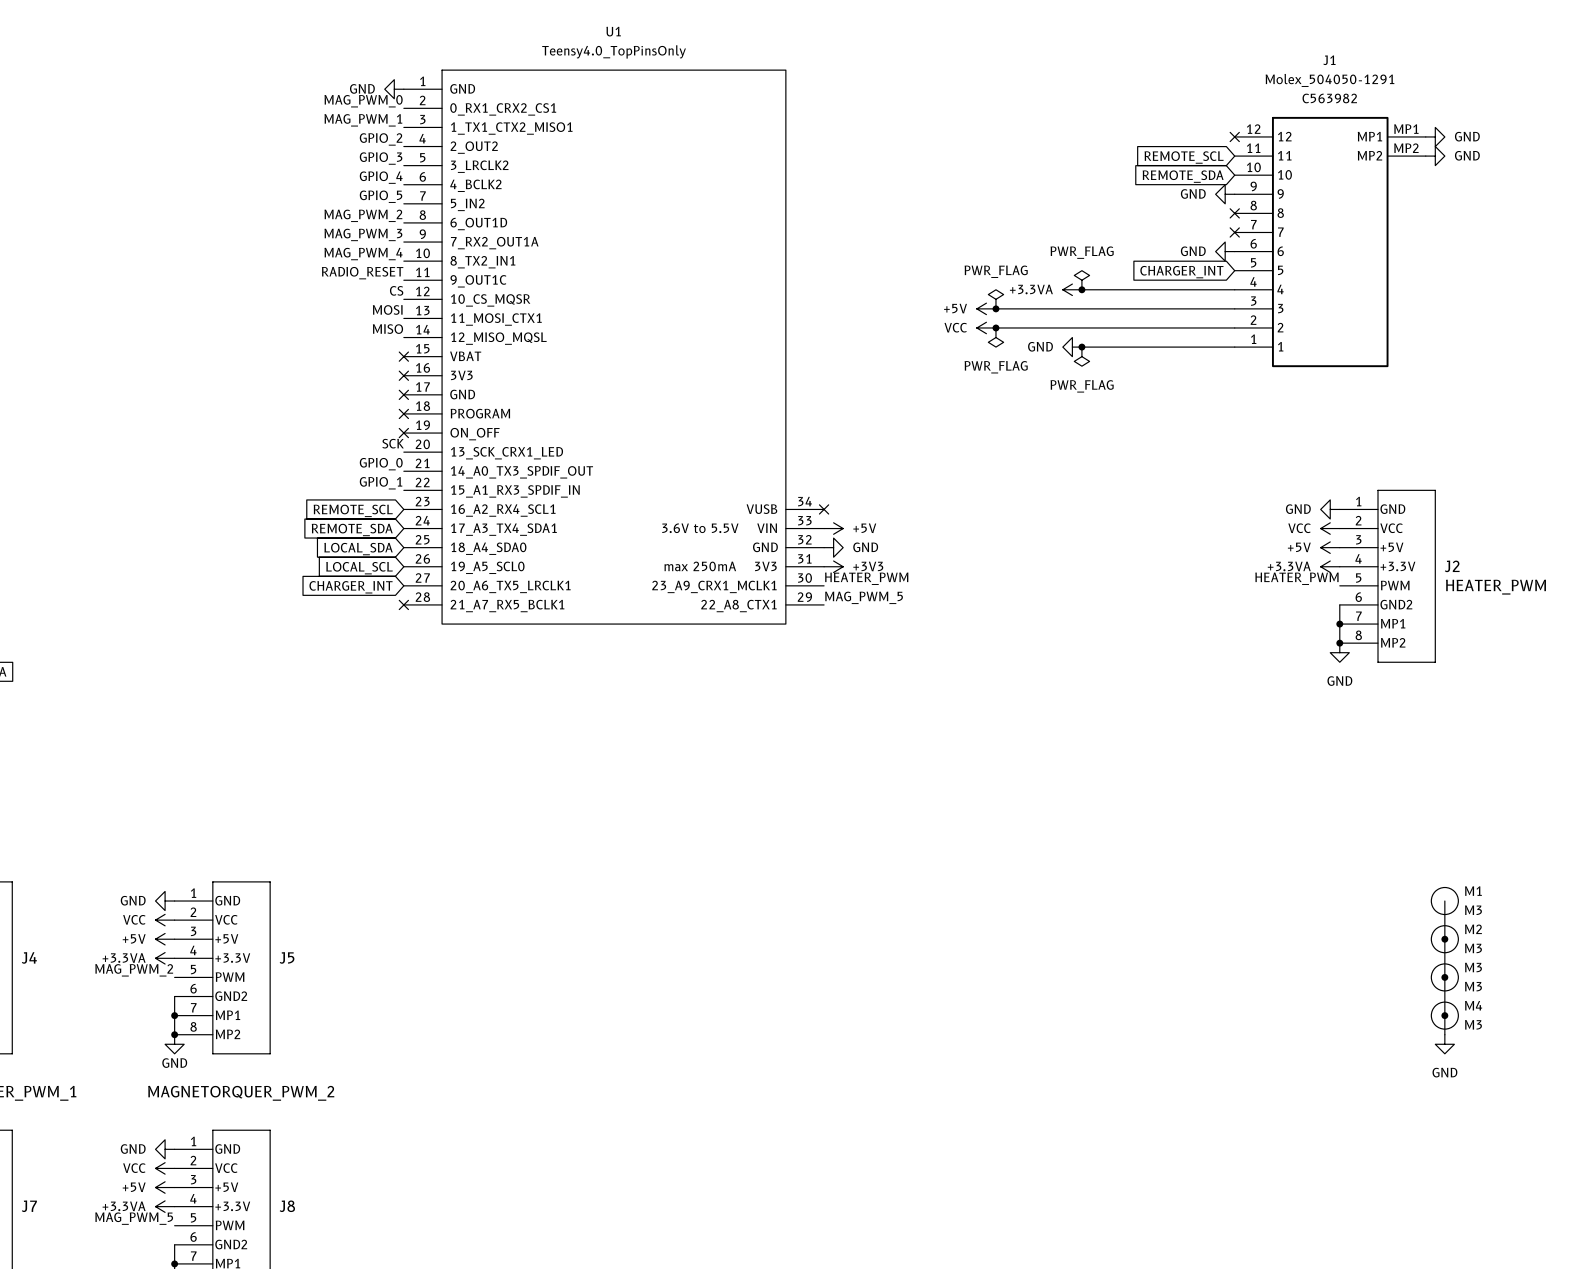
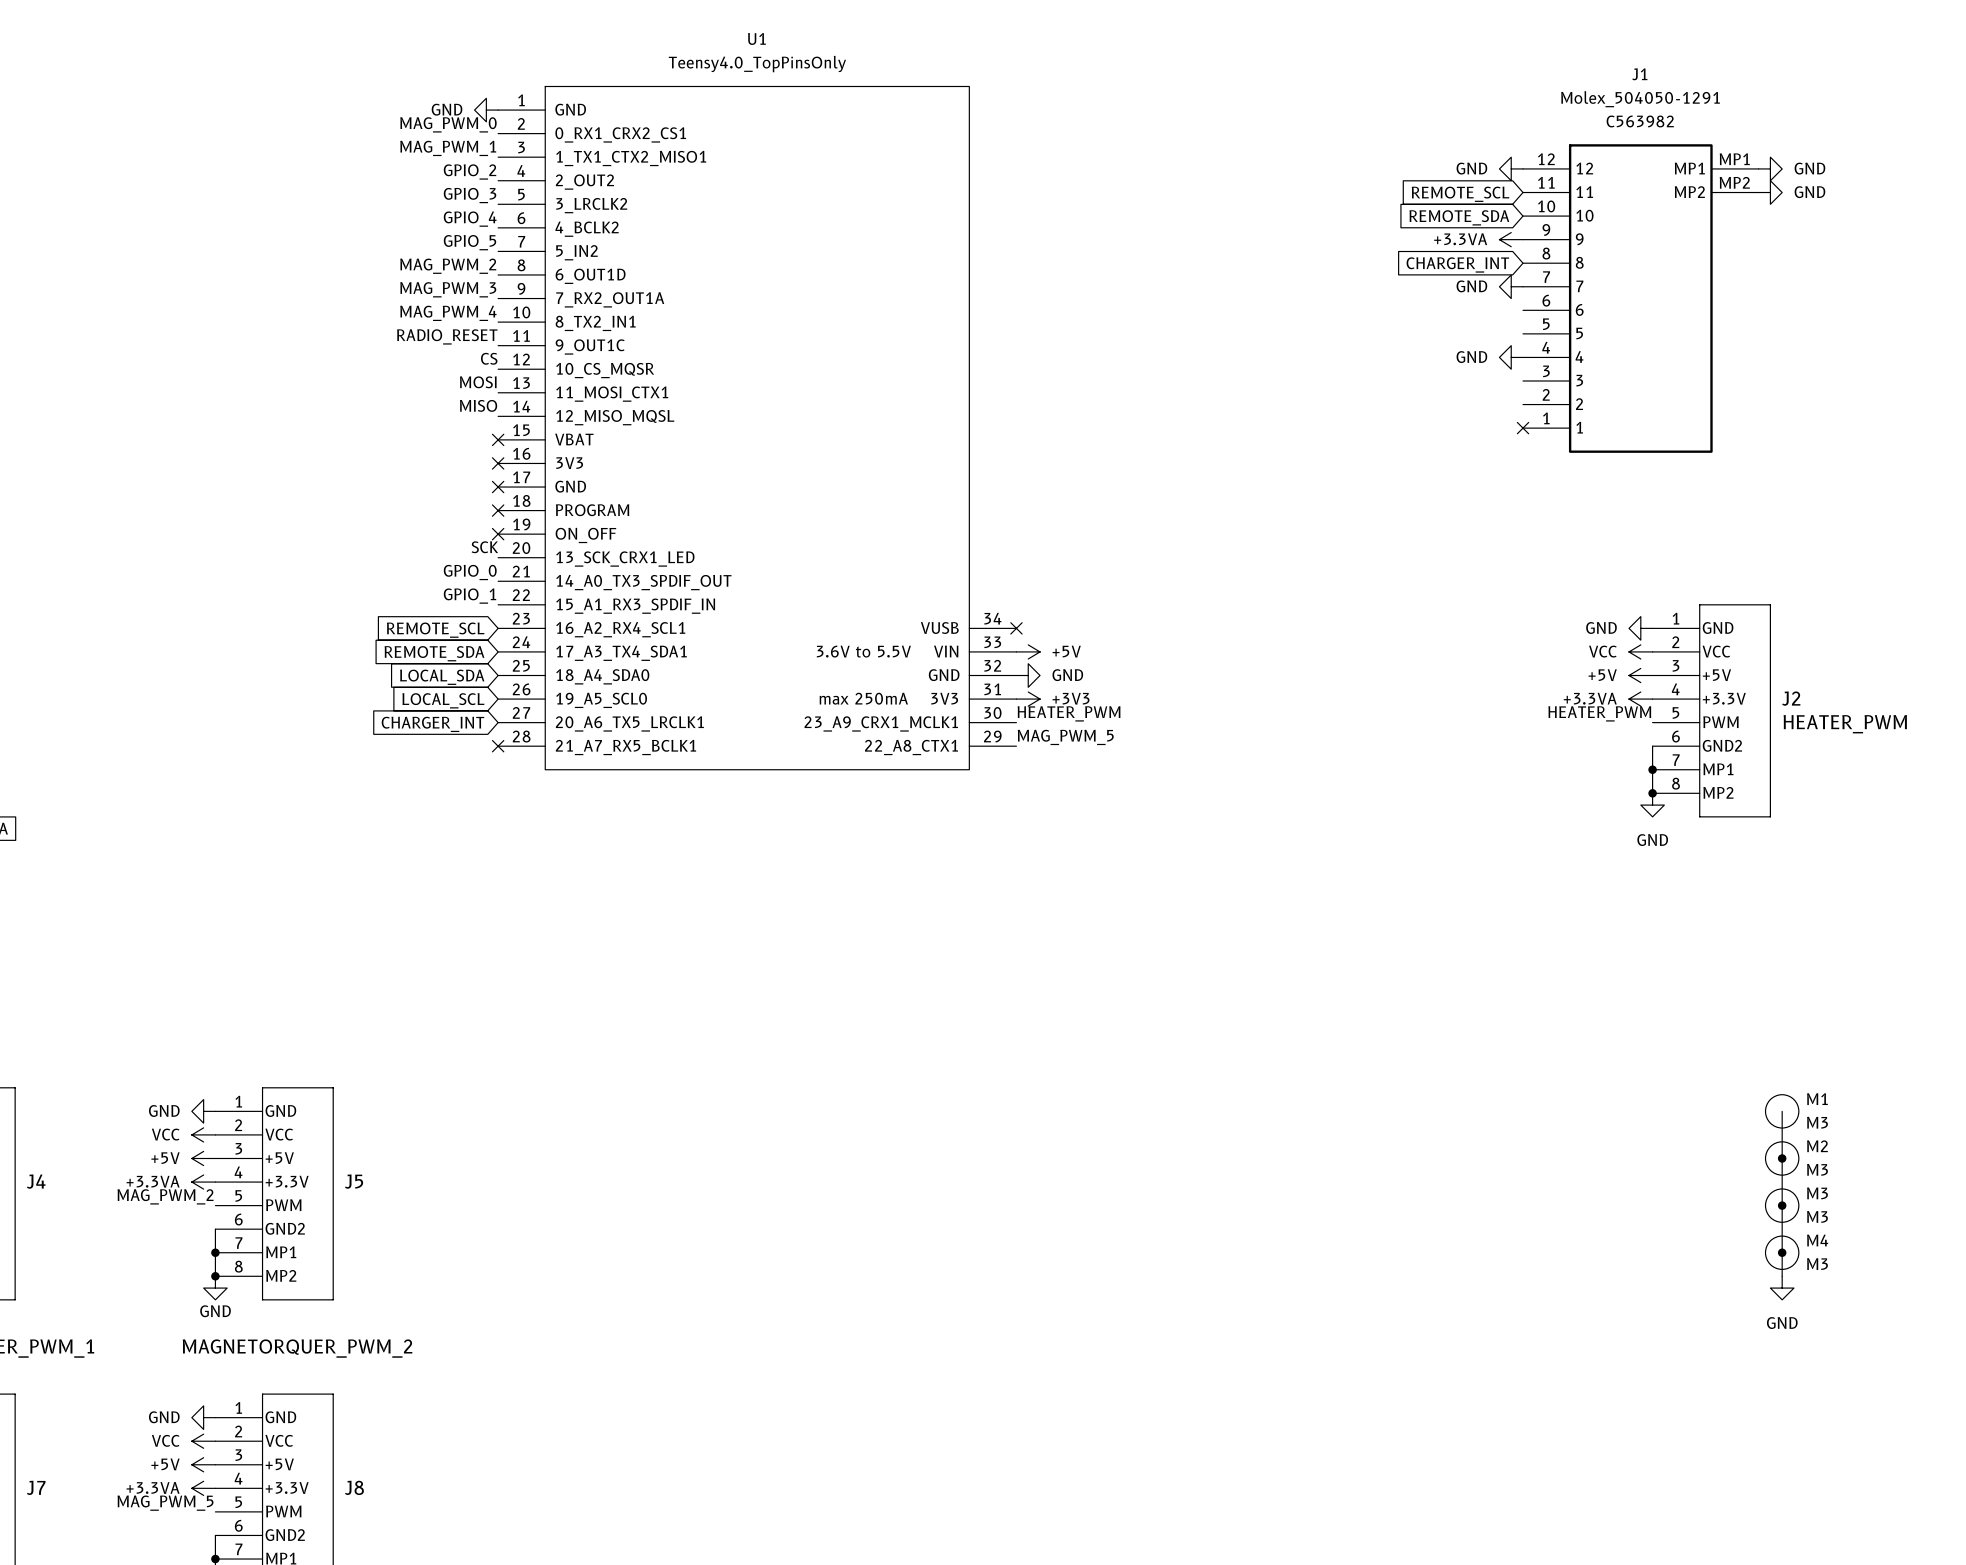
power symbol: none -> GND (1511, 168)
no-connect mark: (1234, 136) -> none
power symbol: GND (1225, 194) -> +3.3VA (1511, 239)
no-connect mark: (1234, 213) -> none
power symbol: none -> GND (1511, 286)
no-connect mark: (1234, 232) -> none
power symbol: GND (1225, 251) -> none
global label position: CHARGER_INT (1181, 272) -> CHARGER_INT (1457, 264)
power symbol: PWR_FLAG (1081, 280) -> none
power symbol: +3.3VA (1072, 289) -> none
wire: (1081, 289) (1234, 289) -> none
junction: (1081, 289) -> none
power symbol: none -> GND (1511, 357)
power symbol: PWR_FLAG (995, 299) -> none
power symbol: +5V (986, 308) -> none
wire: (995, 308) (1234, 308) -> none
junction: (995, 308) -> none
power symbol: VCC (986, 327) -> none
wire: (995, 327) (1234, 327) -> none
junction: (995, 327) -> none
power symbol: PWR_FLAG (995, 337) -> none
power symbol: GND (1072, 347) -> none
wire: (1081, 347) (1234, 347) -> none
junction: (1081, 347) -> none
no-connect mark: none -> (1523, 428)
power symbol: PWR_FLAG (1081, 356) -> none

